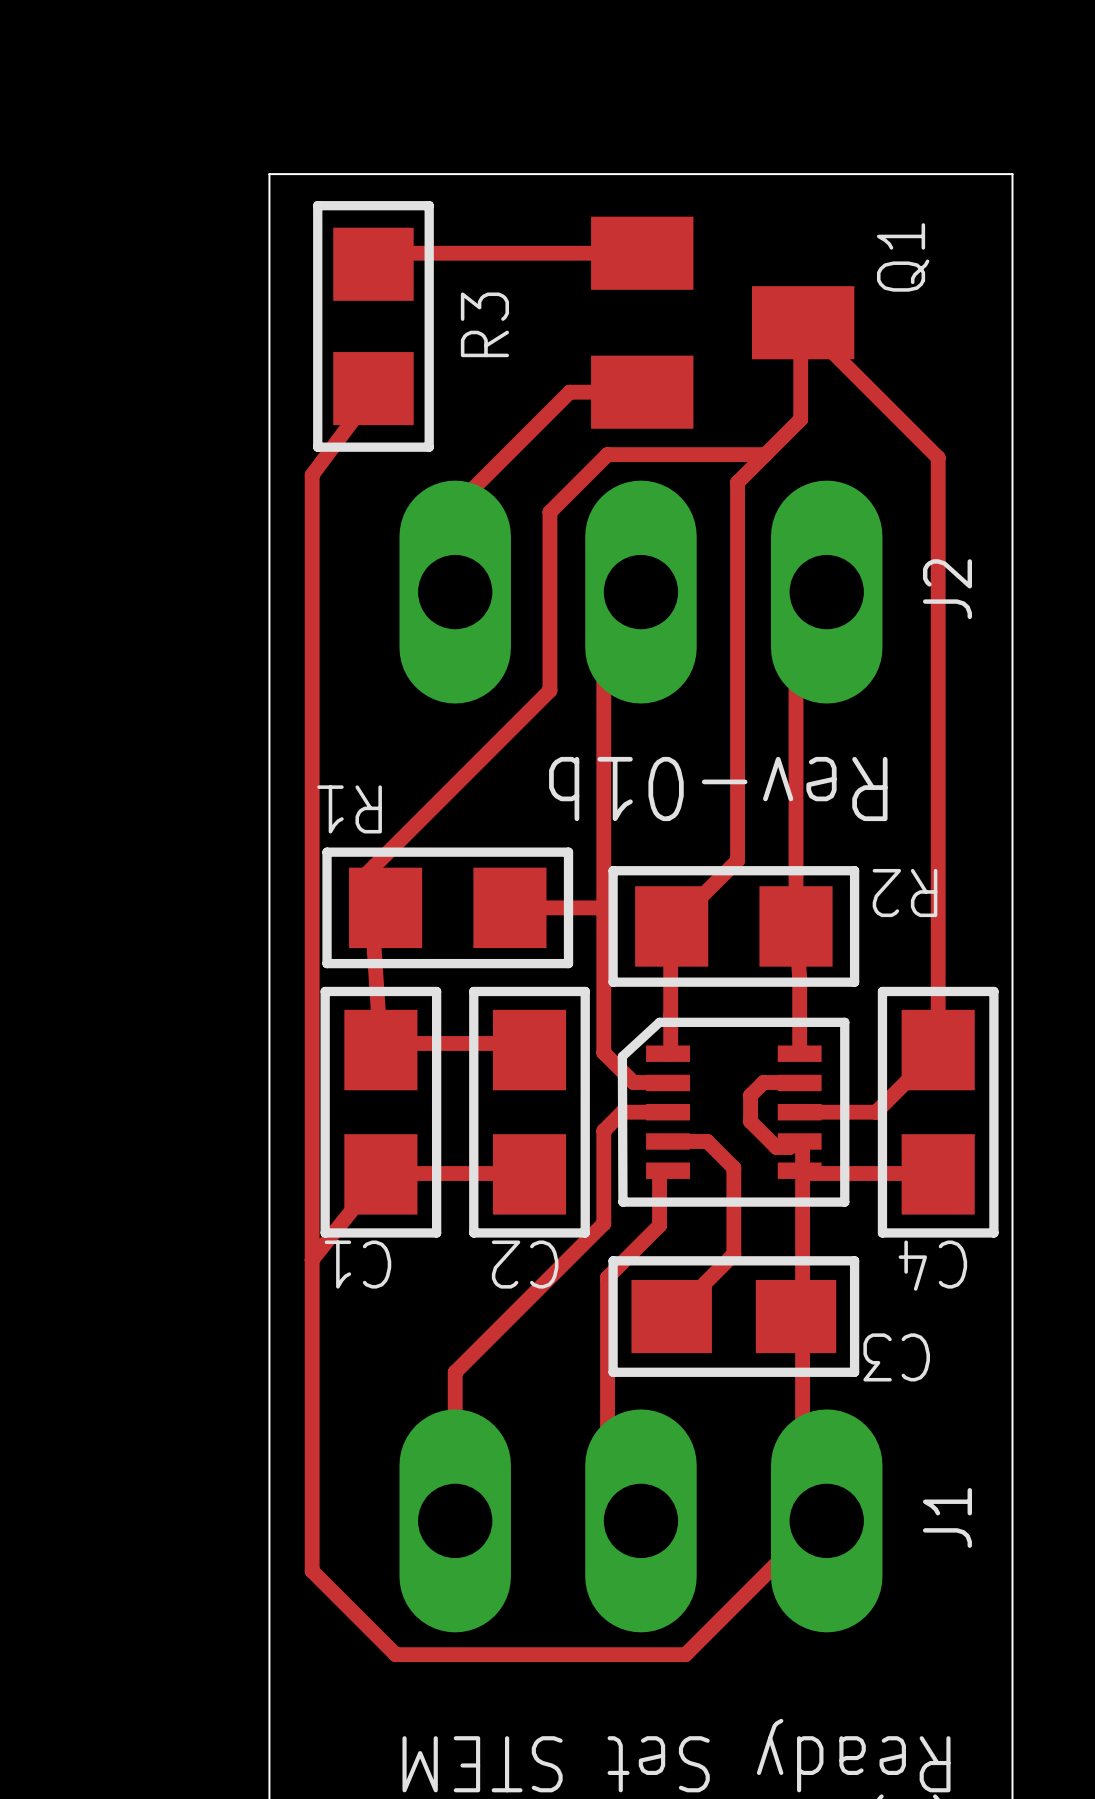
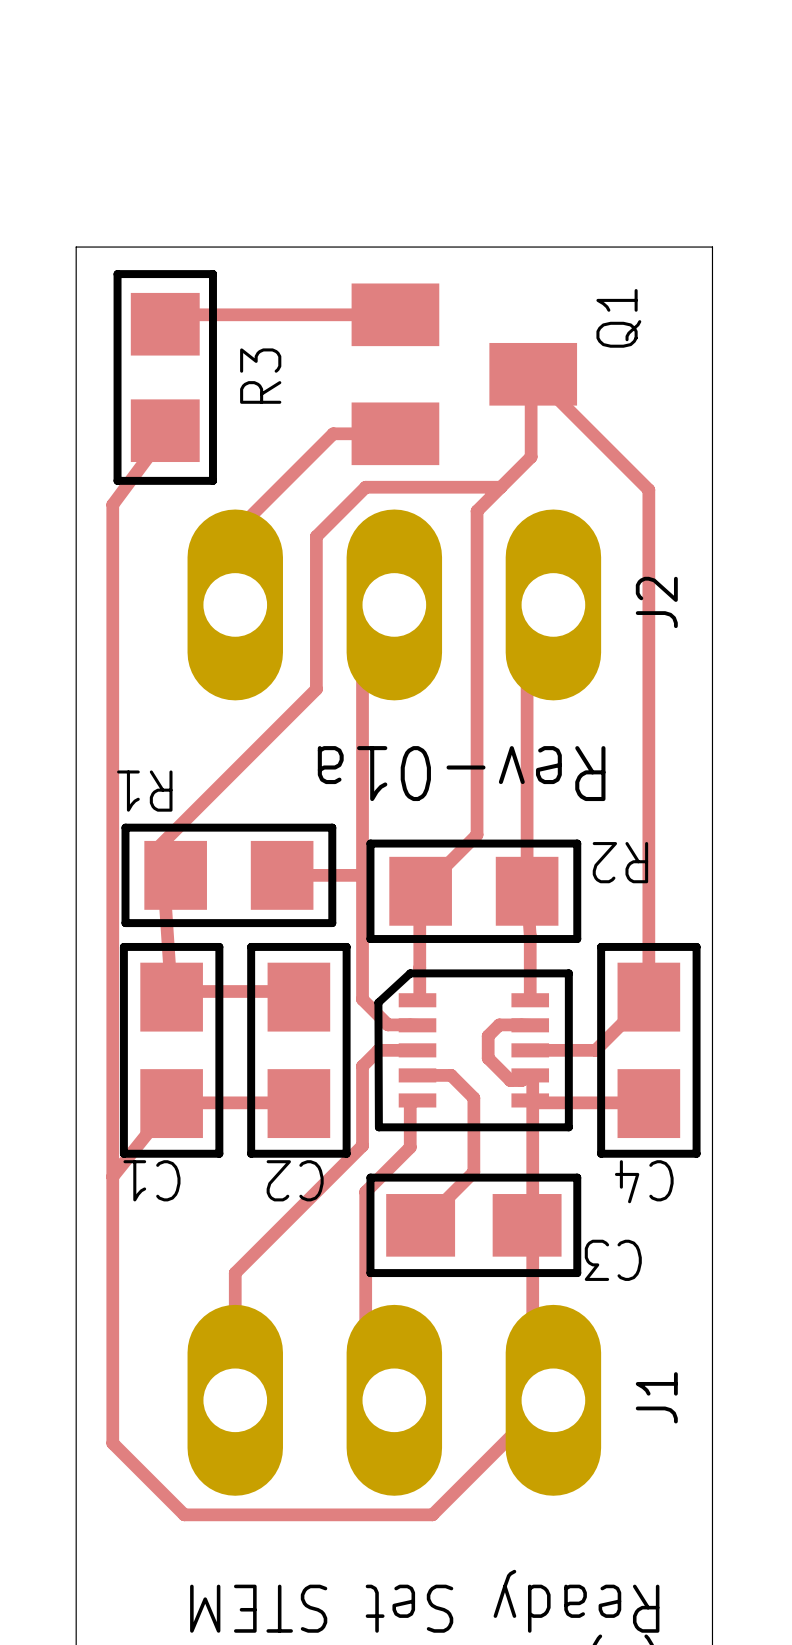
text: Rev-01b (718, 788) -> Rev-01a (461, 773)

